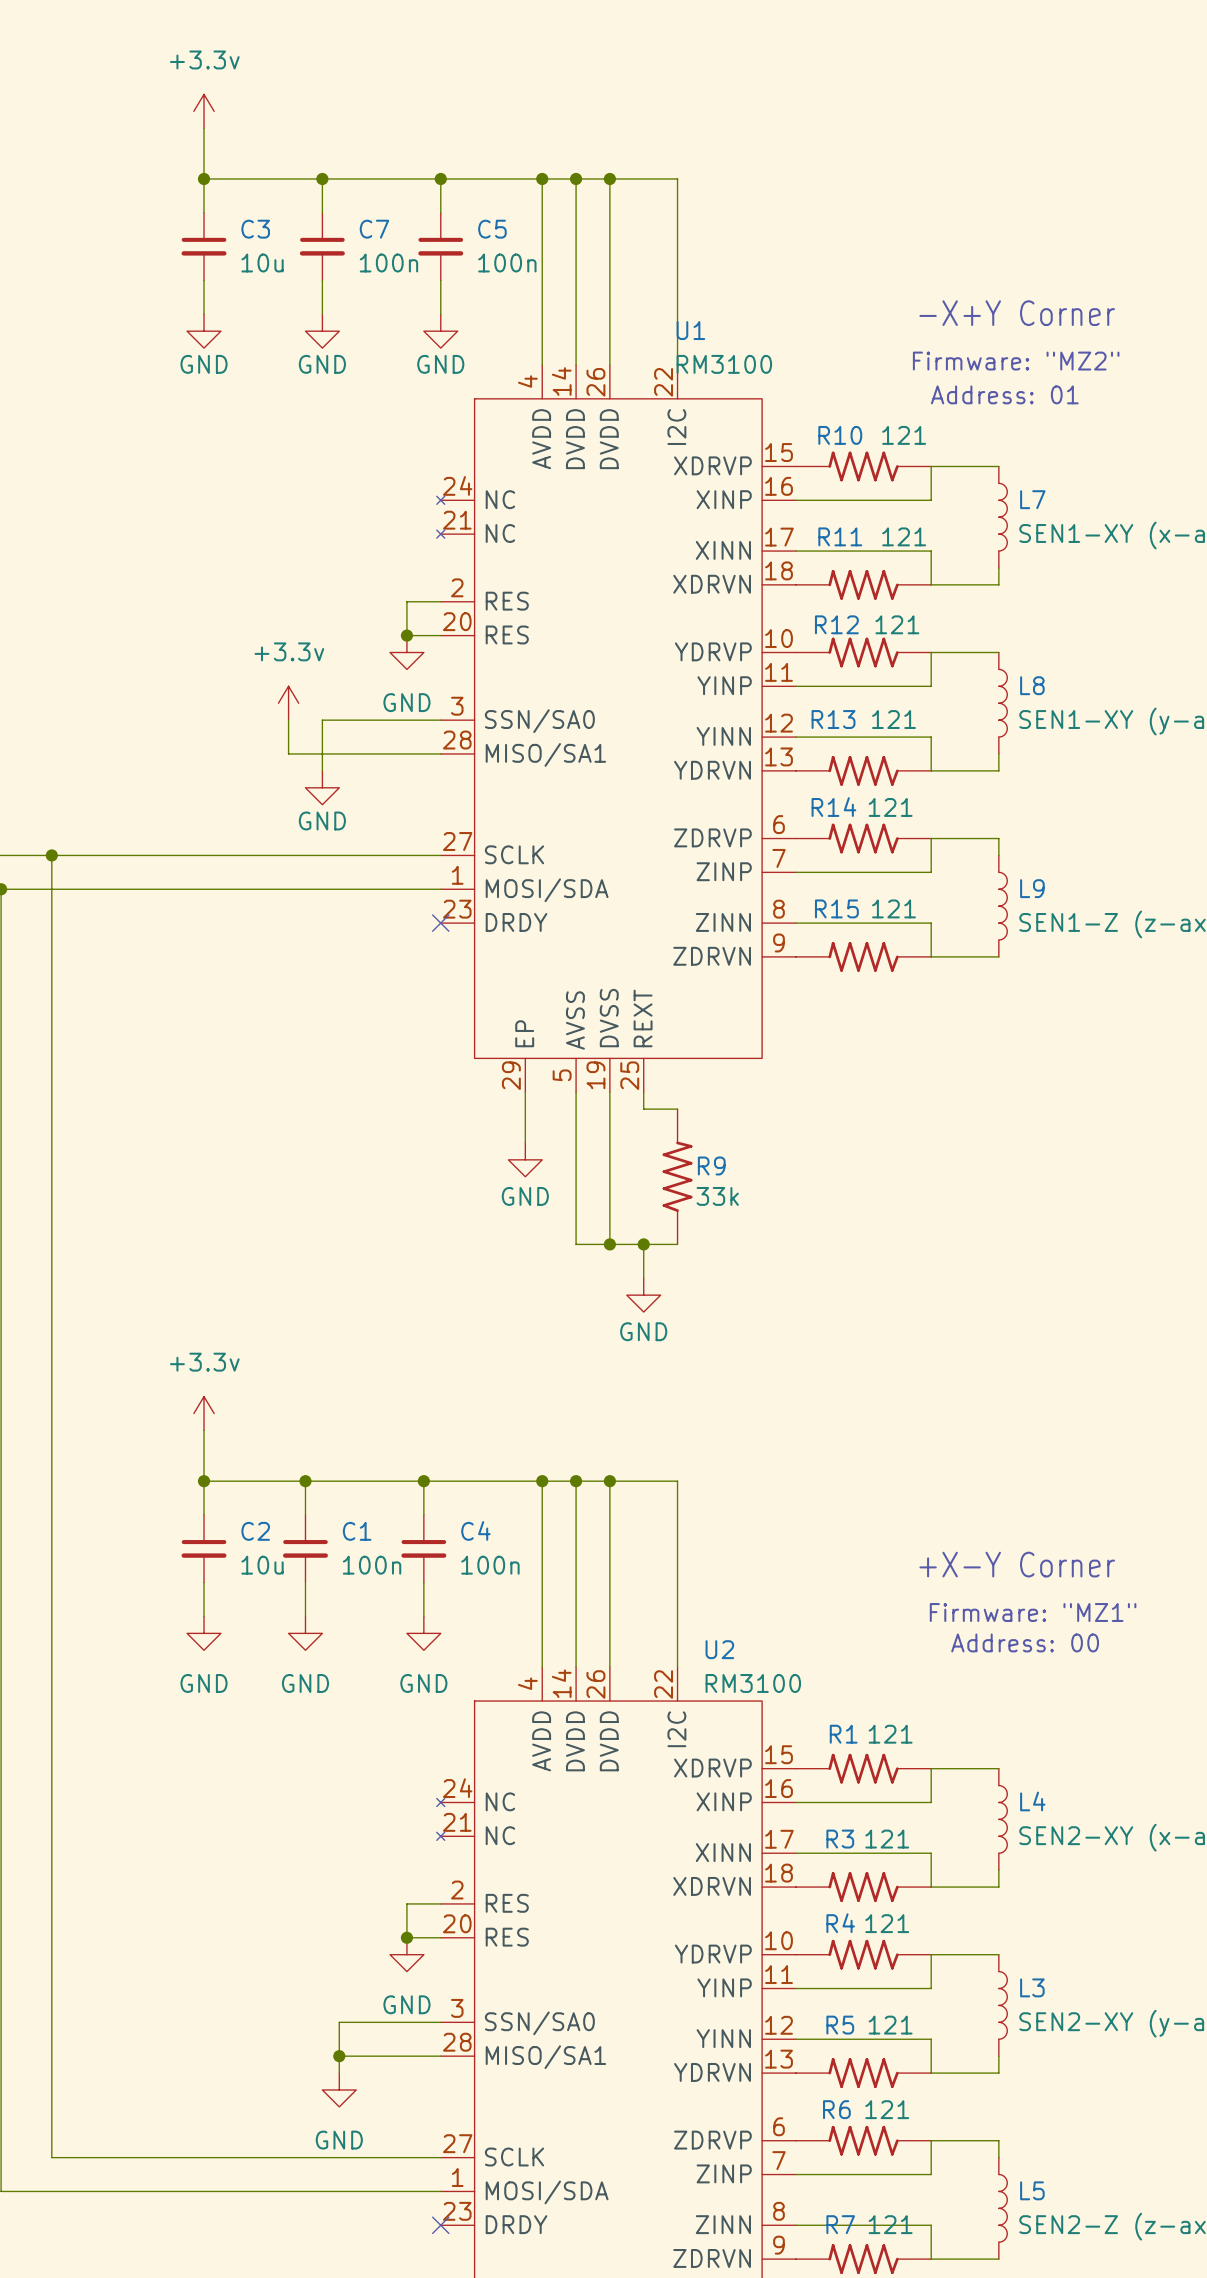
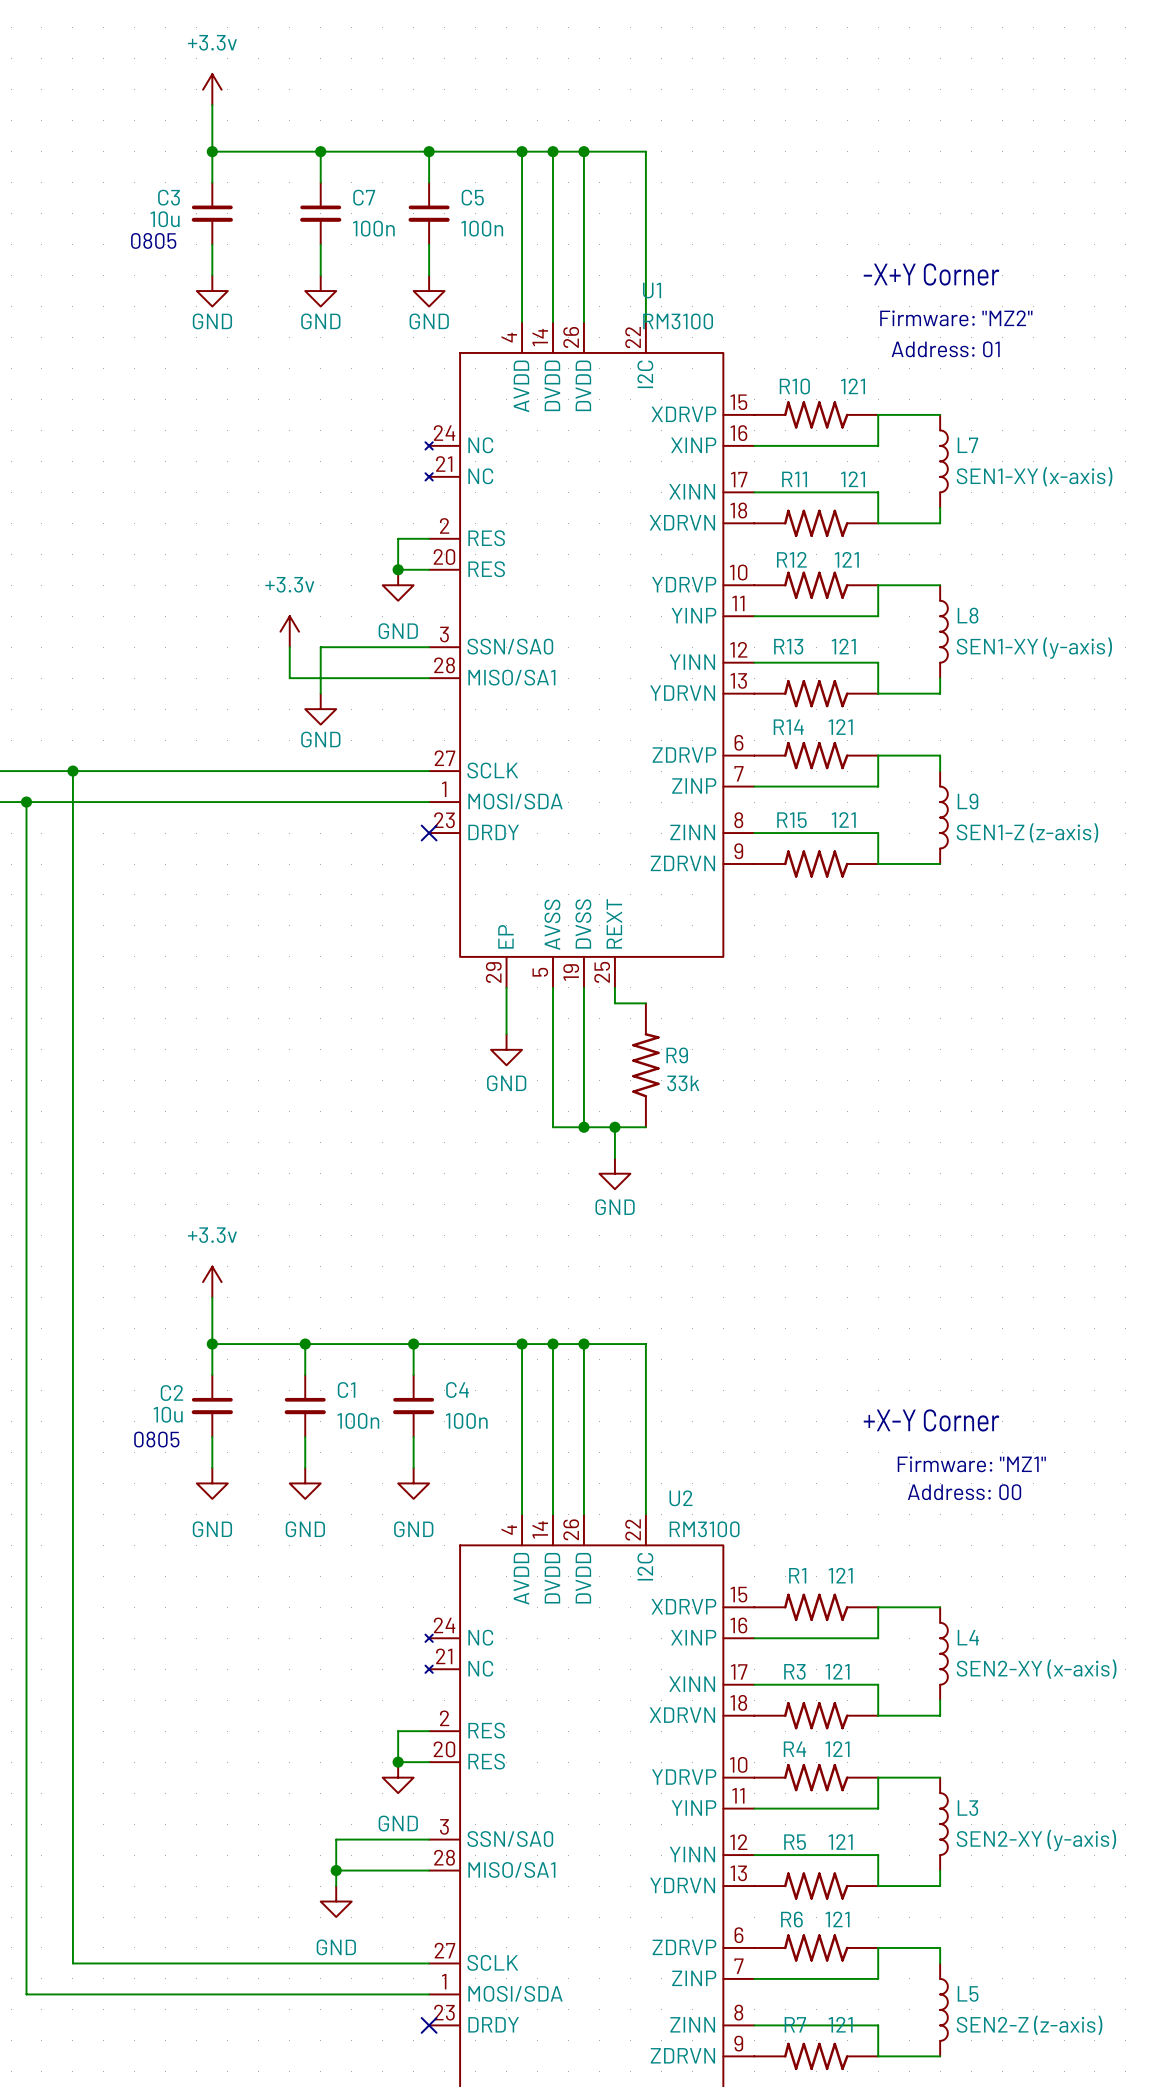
C3 name position: C3 (255, 229) -> C3 (169, 197)
C3 value position: 10u (262, 262) -> 10u (165, 219)
text: none -> 0805 (153, 240)
C2 name position: C2 (255, 1531) -> C2 (171, 1393)
C2 value position: 10u (262, 1565) -> 10u (168, 1414)
text: none -> 0805 (156, 1439)

